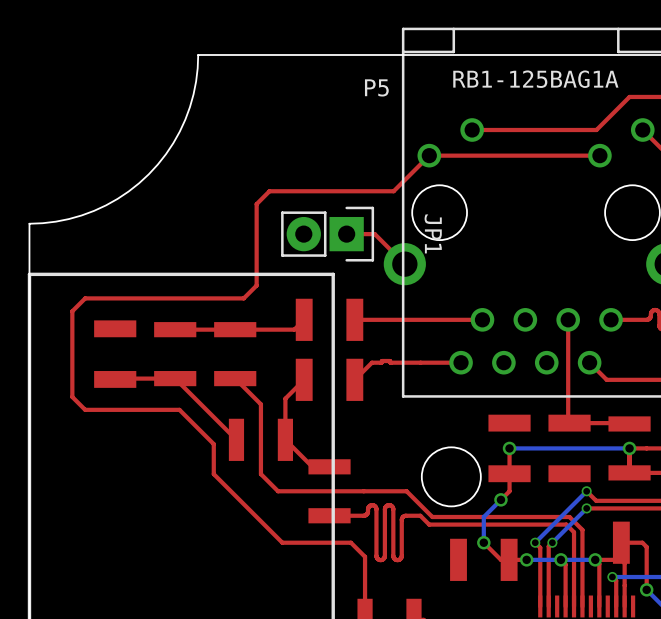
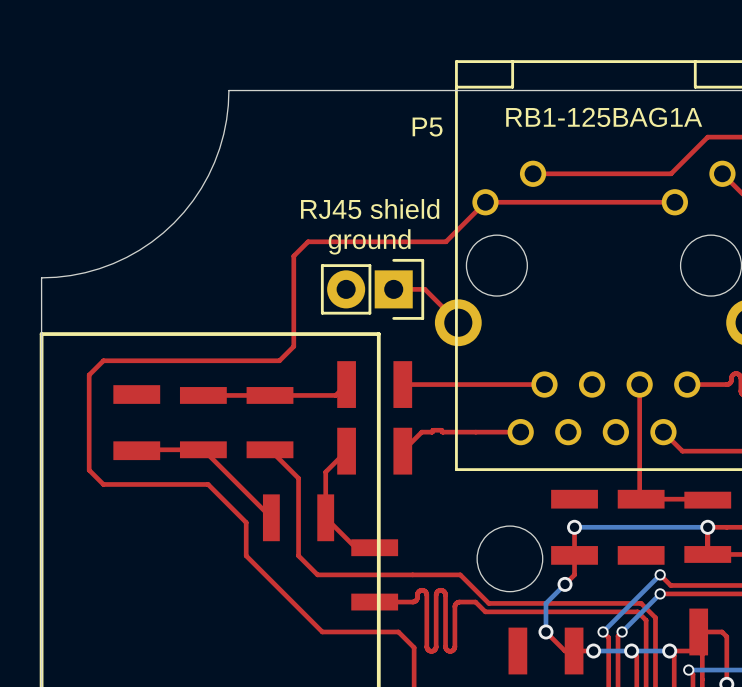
text: none -> RJ45 shield (370, 209)
text: none -> ground (369, 241)
JP1 name: JP1 (433, 233) -> none

